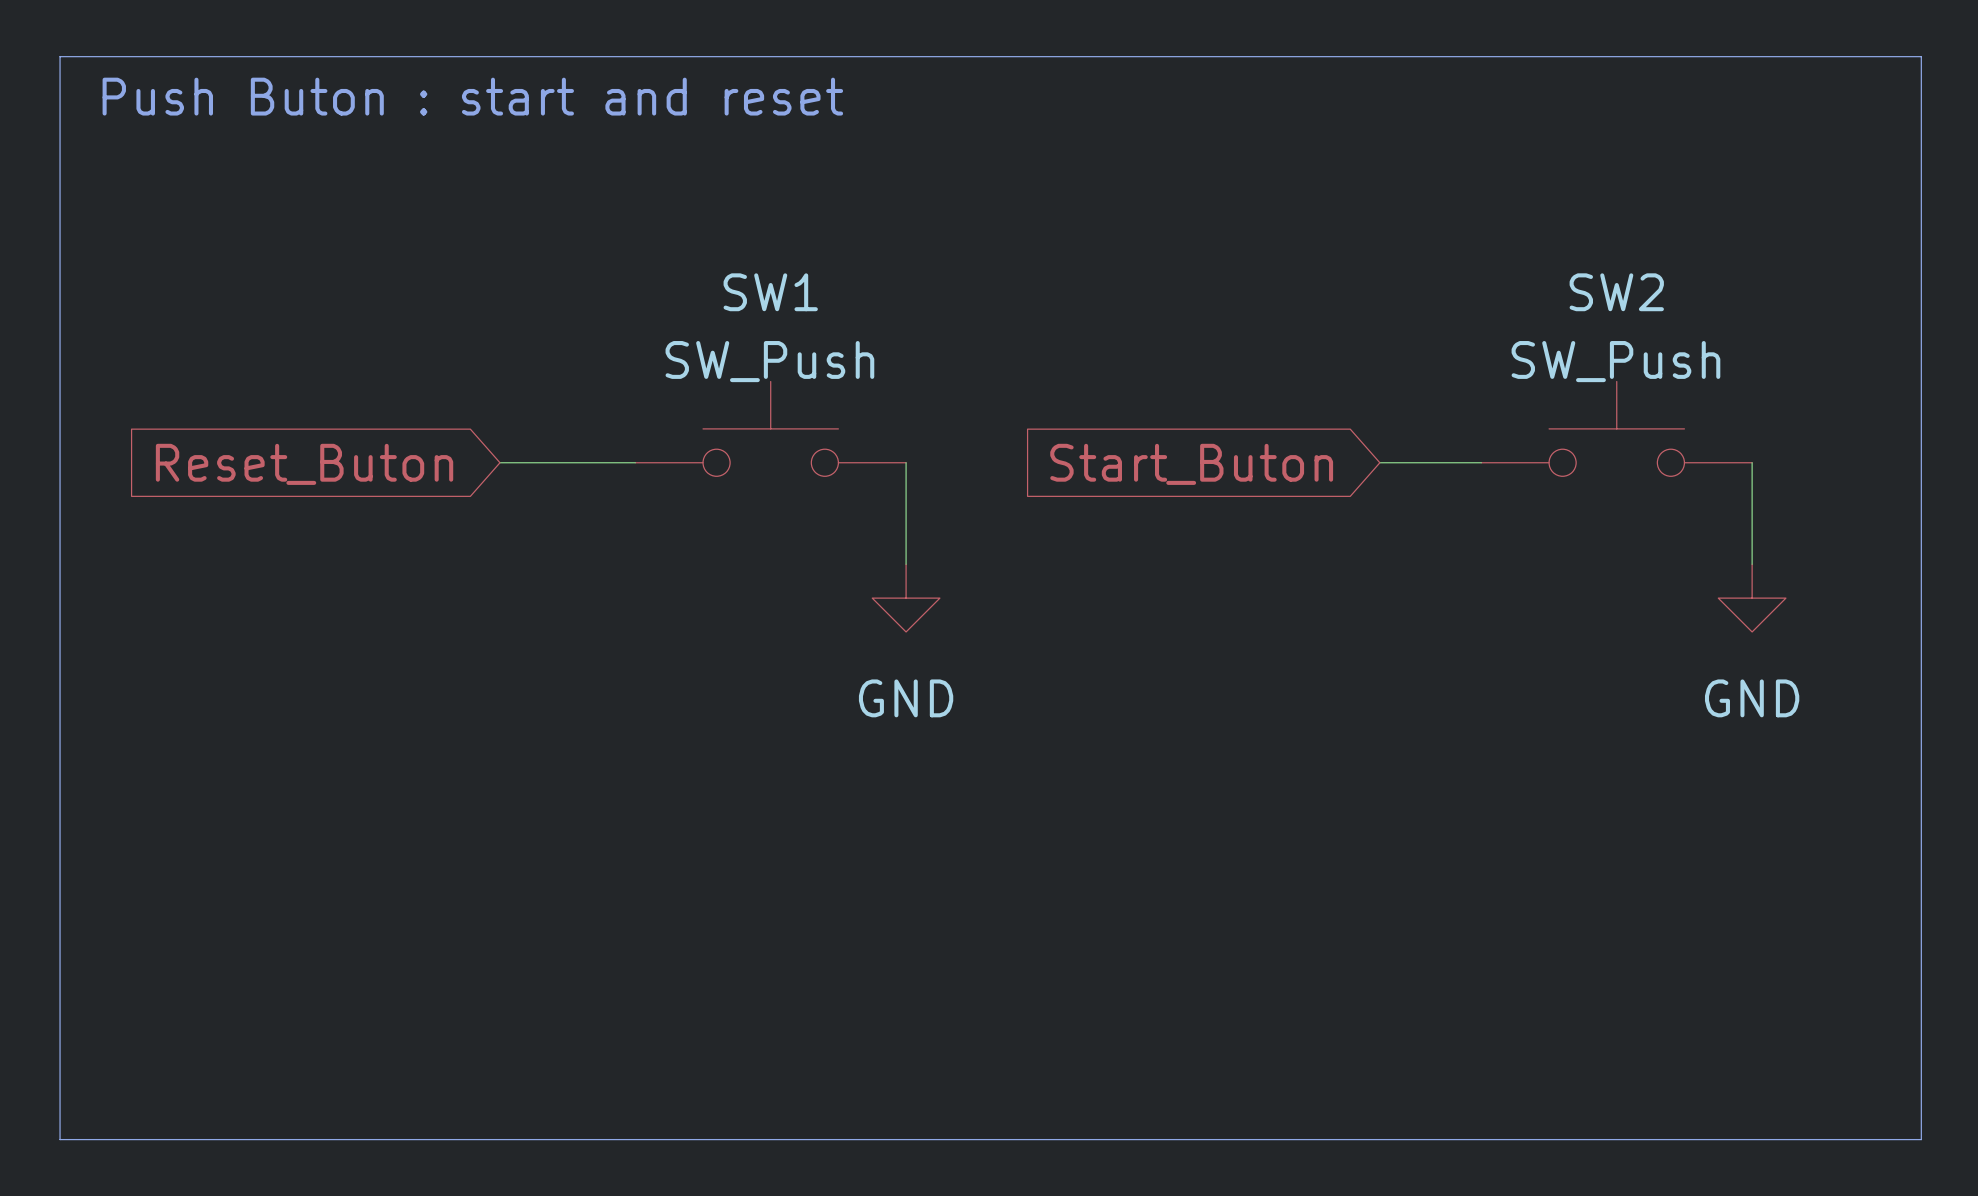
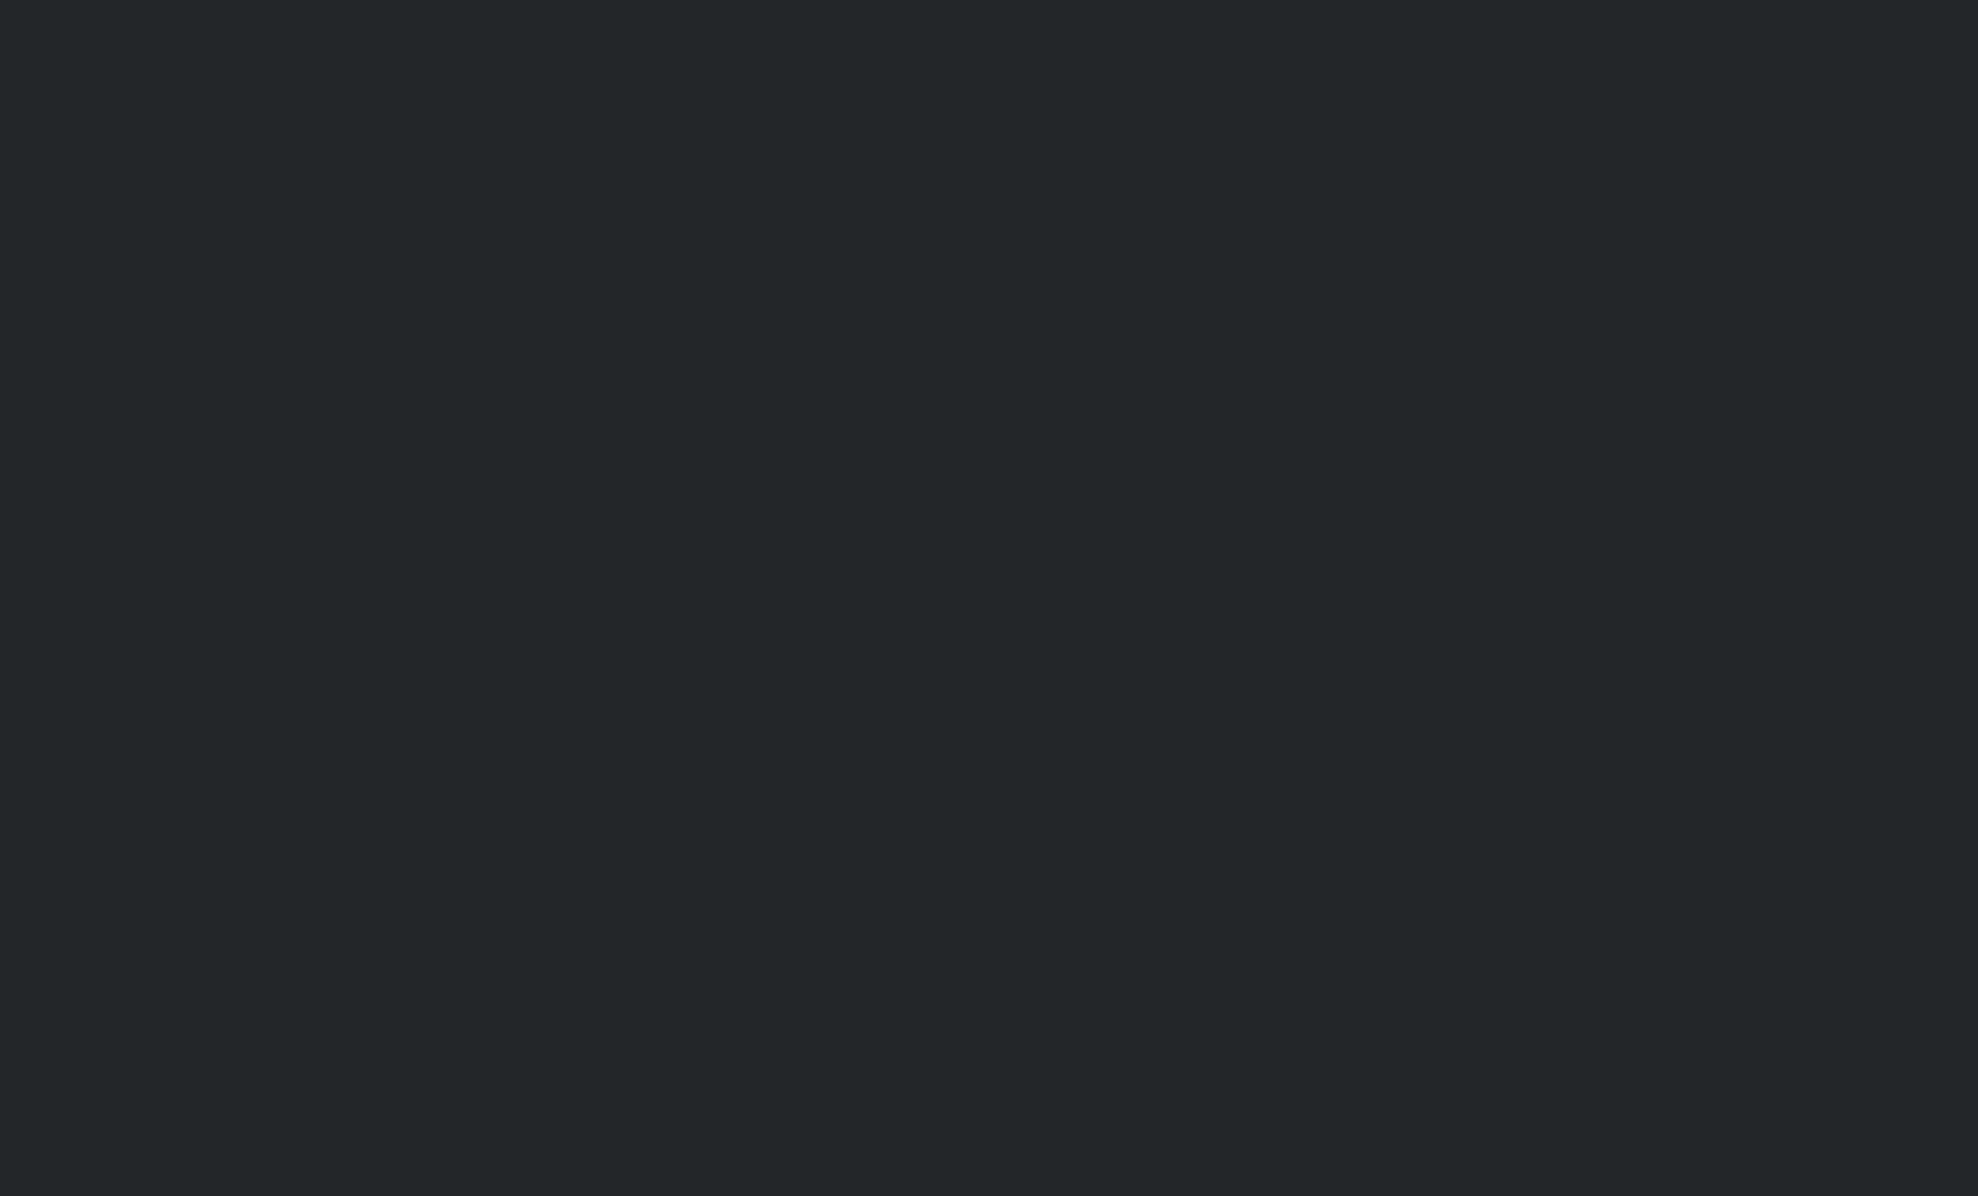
line: (60, 56) (60, 1139) (1921, 1139) (1921, 56) (60, 56) -> none
text: Push Buton : start and reset (472, 96) -> none
SW1: SW_Push (770, 428) -> none
SW2: SW_Push (1616, 428) -> none
wire: (499, 462) (635, 462) -> none
wire: (906, 462) (906, 564) -> none
wire: (1379, 462) (1481, 462) -> none
wire: (1752, 462) (1752, 564) -> none
global label: Reset_Buton (304, 464) -> none
global label: Start_Buton (1191, 464) -> none
power symbol: GND (906, 598) -> none
power symbol: GND (1752, 598) -> none

